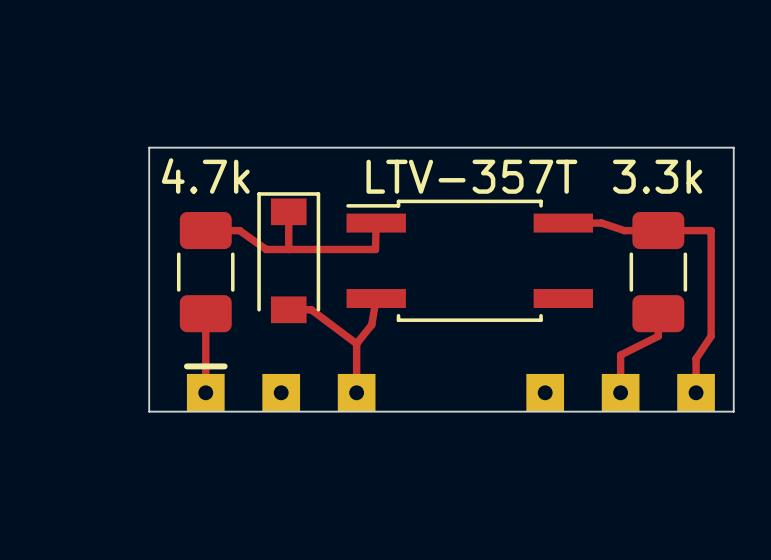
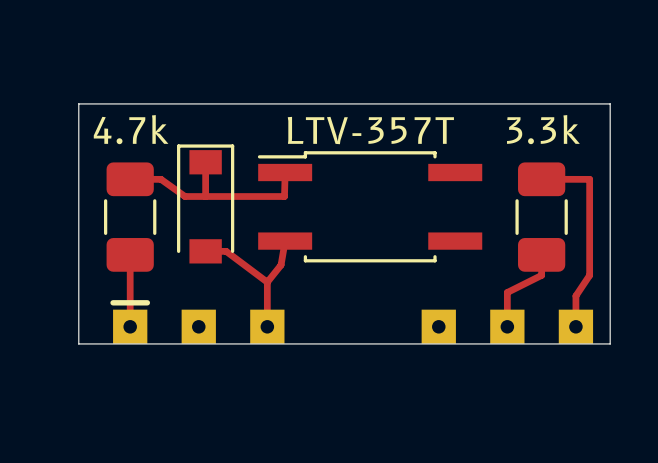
top track: (563, 223) (601, 223) (624, 230) (658, 230) -> none

